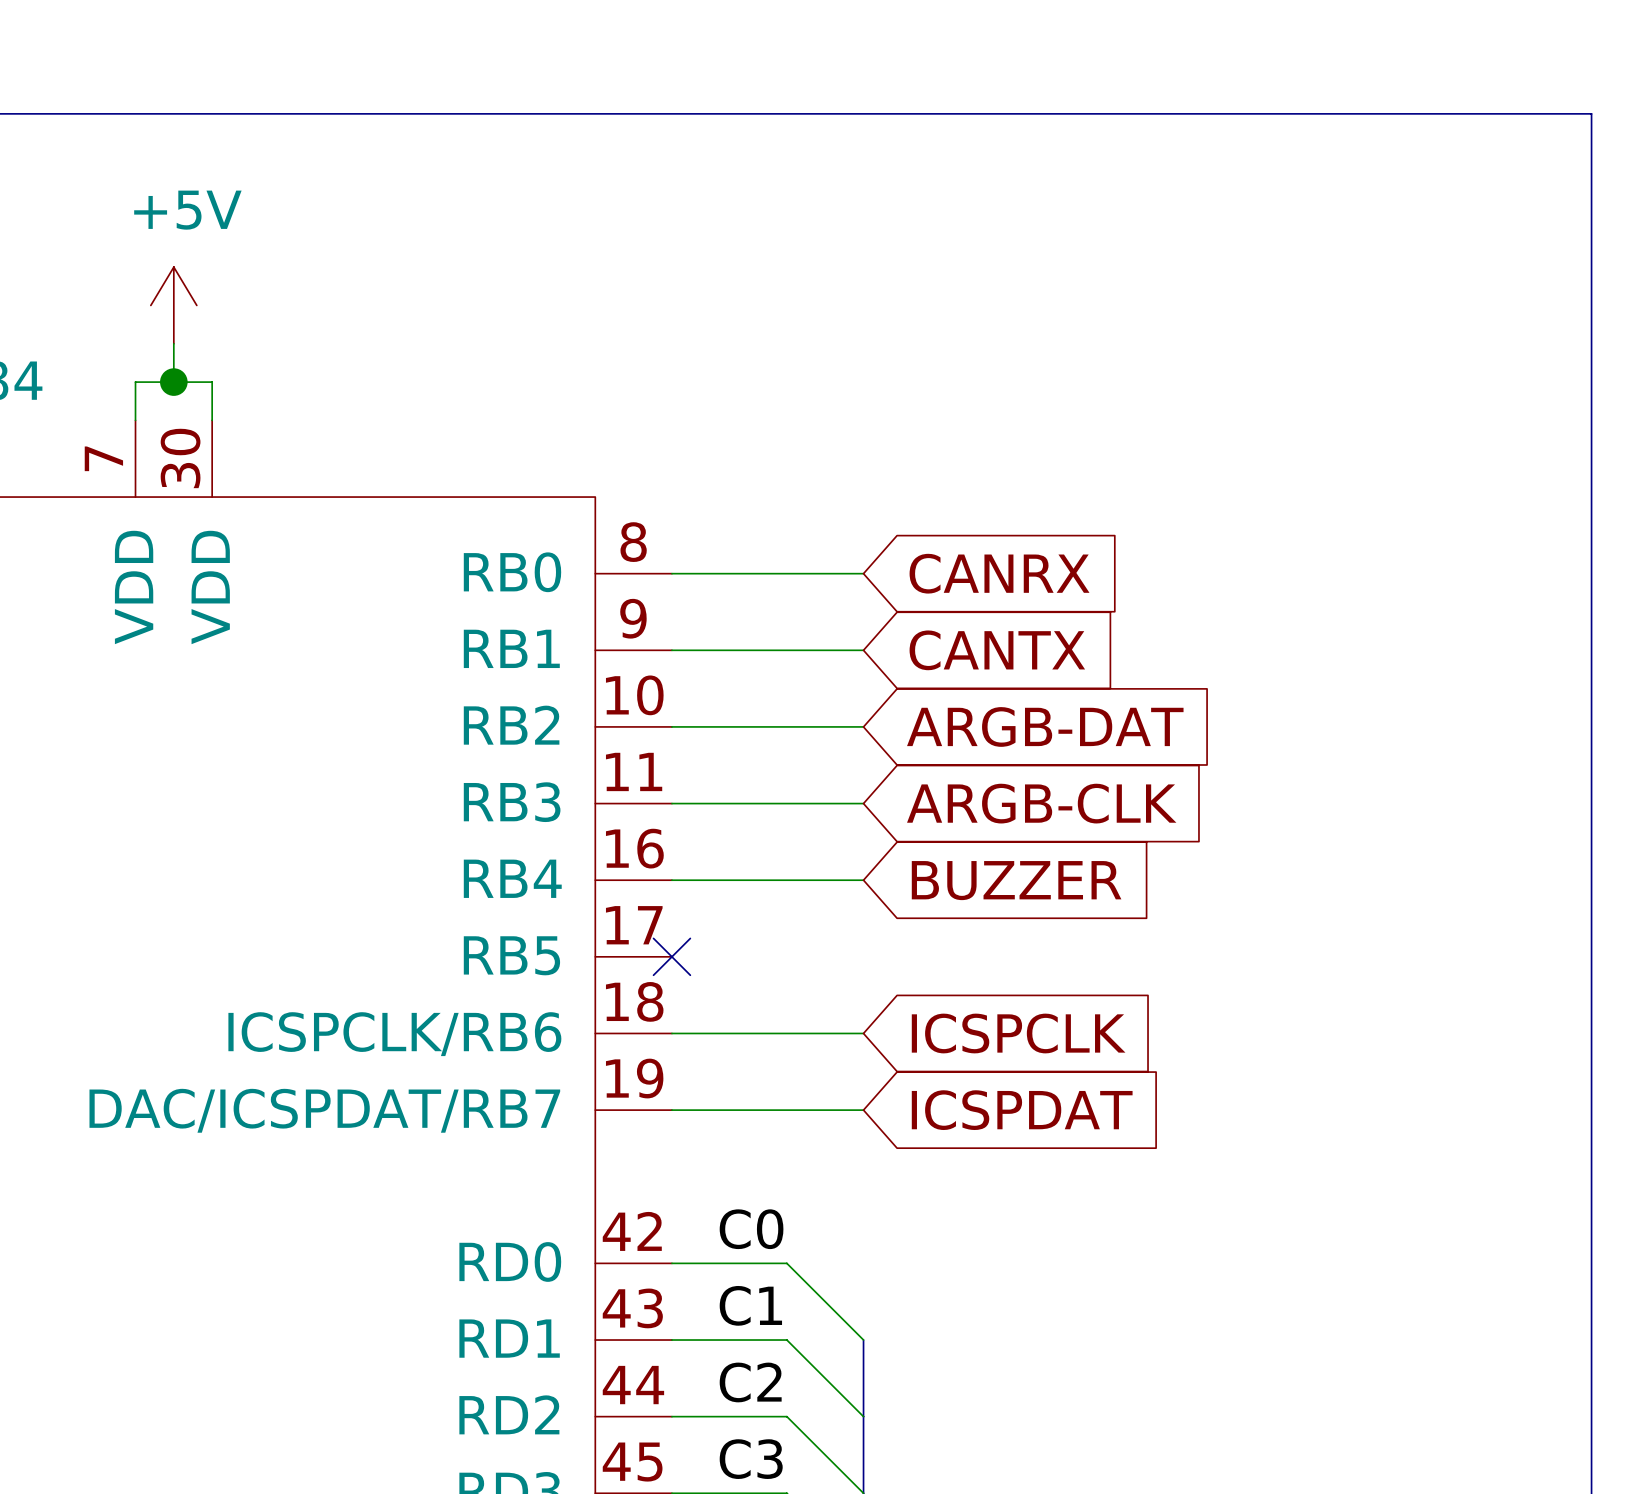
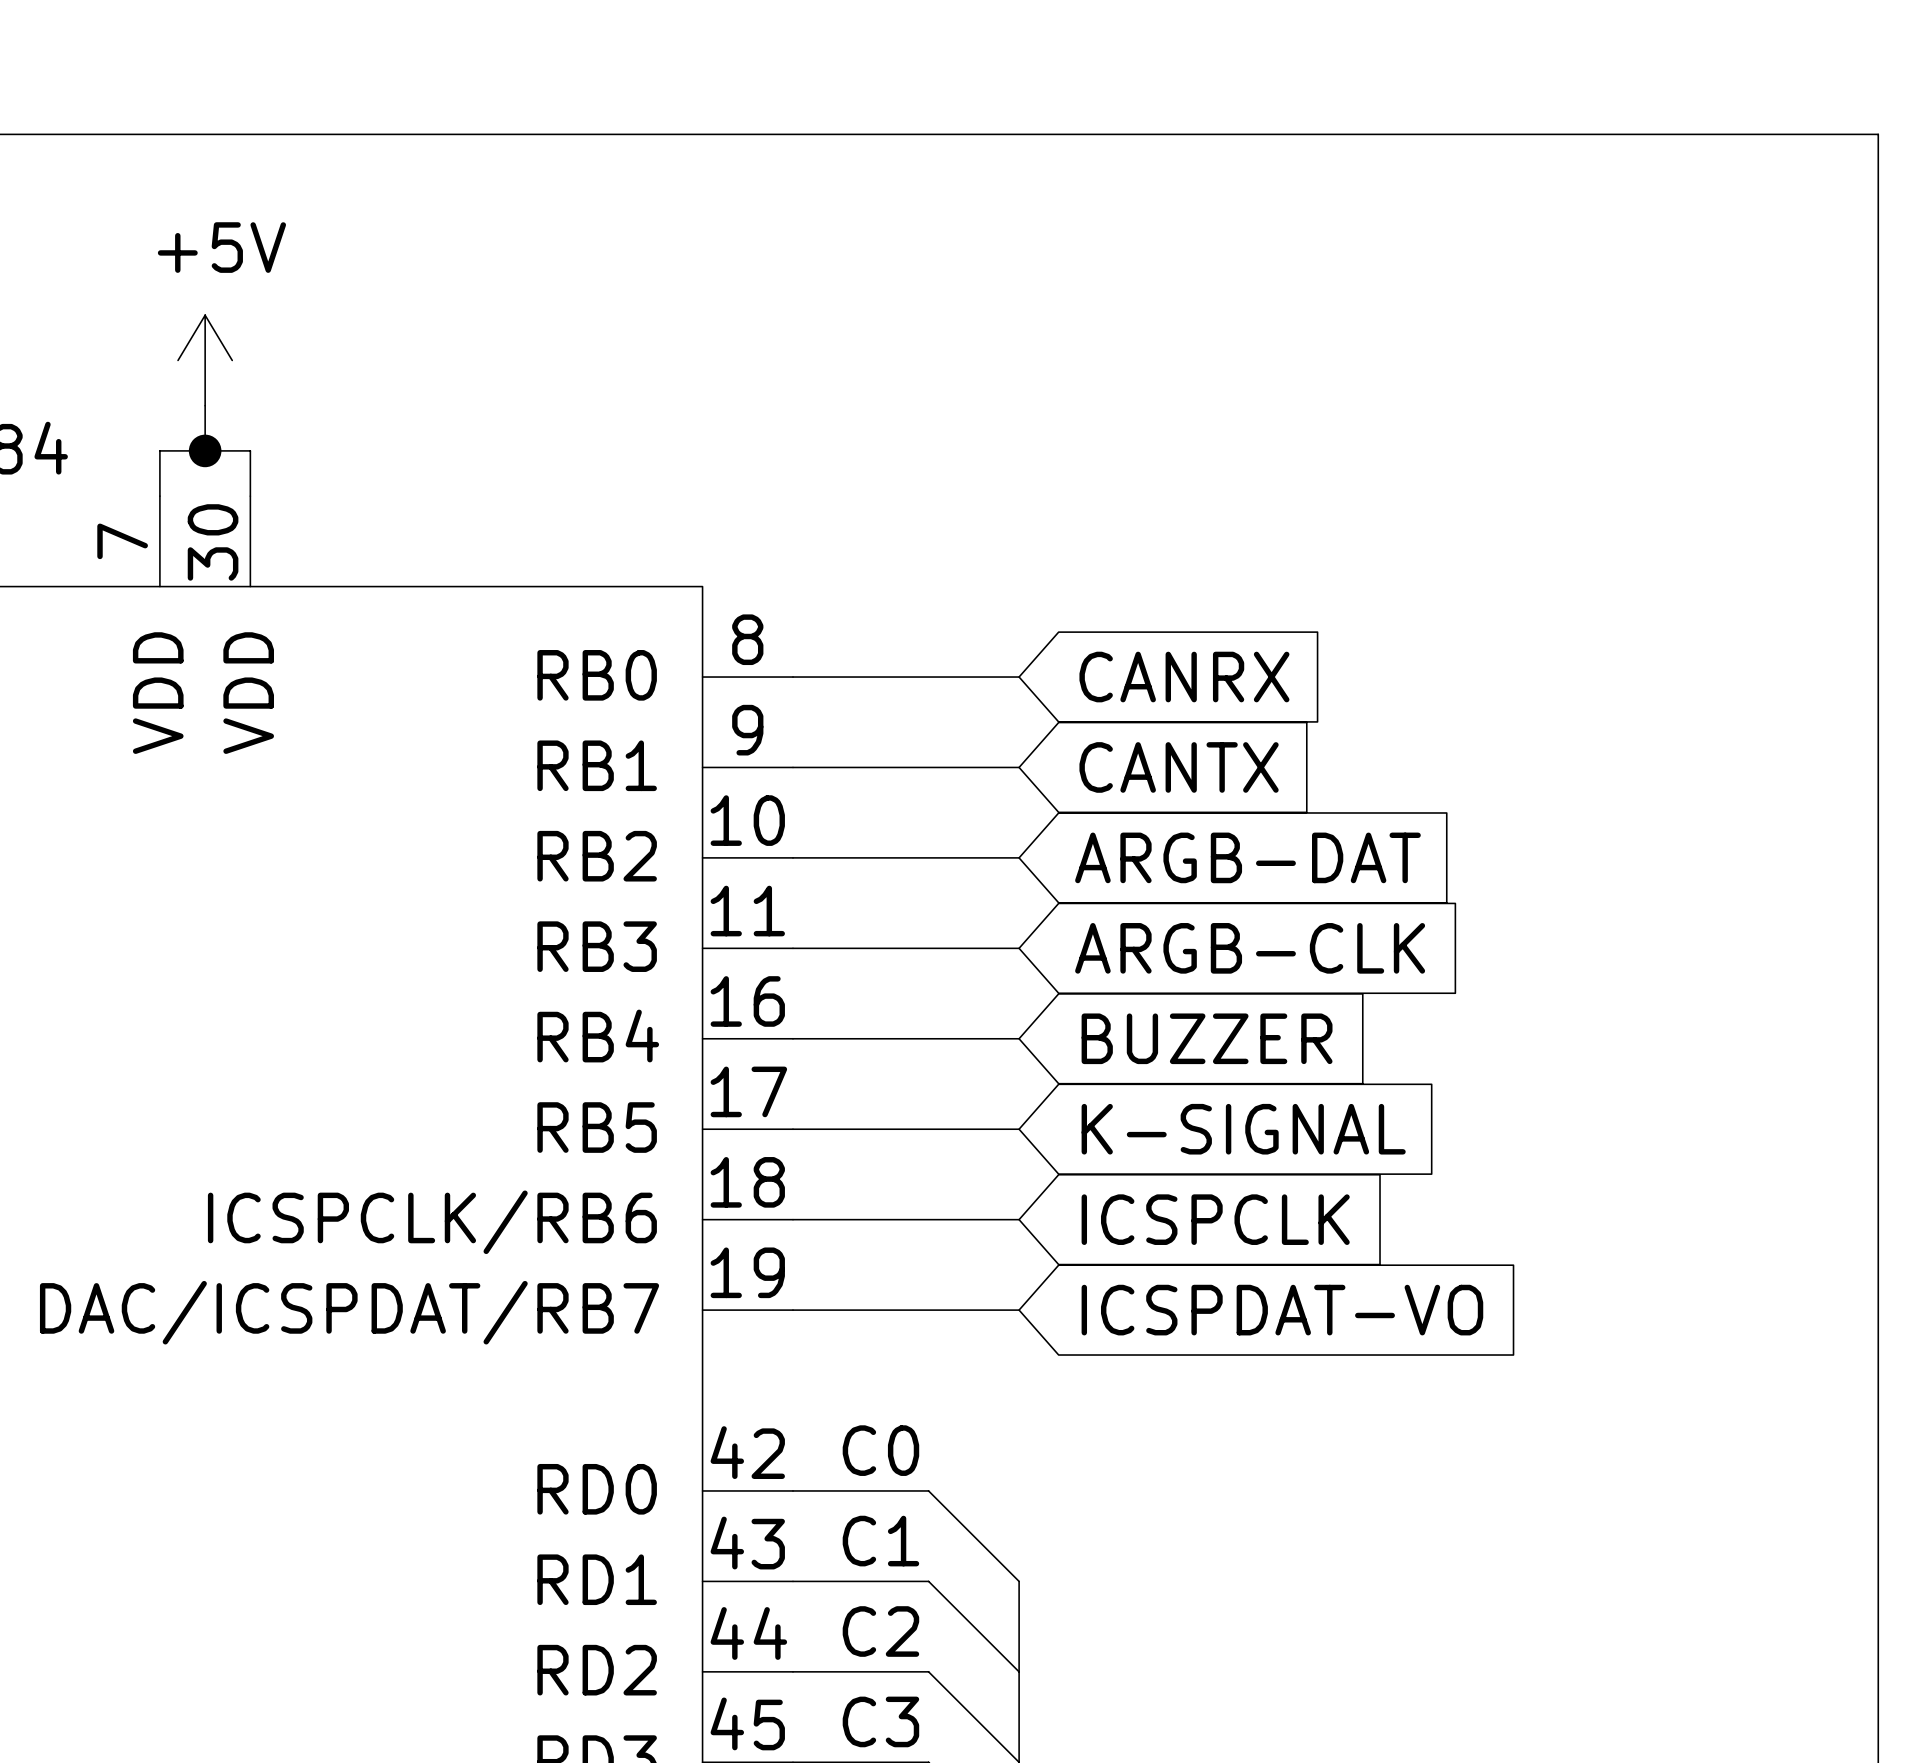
wire: none -> (793, 1129) (1019, 1129)
no-connect mark: (671, 956) -> none
global label: none -> K-SIGNAL (1243, 1129)
global label: ICSPDAT (1022, 1110) -> ICSPDAT-VO (1282, 1310)

